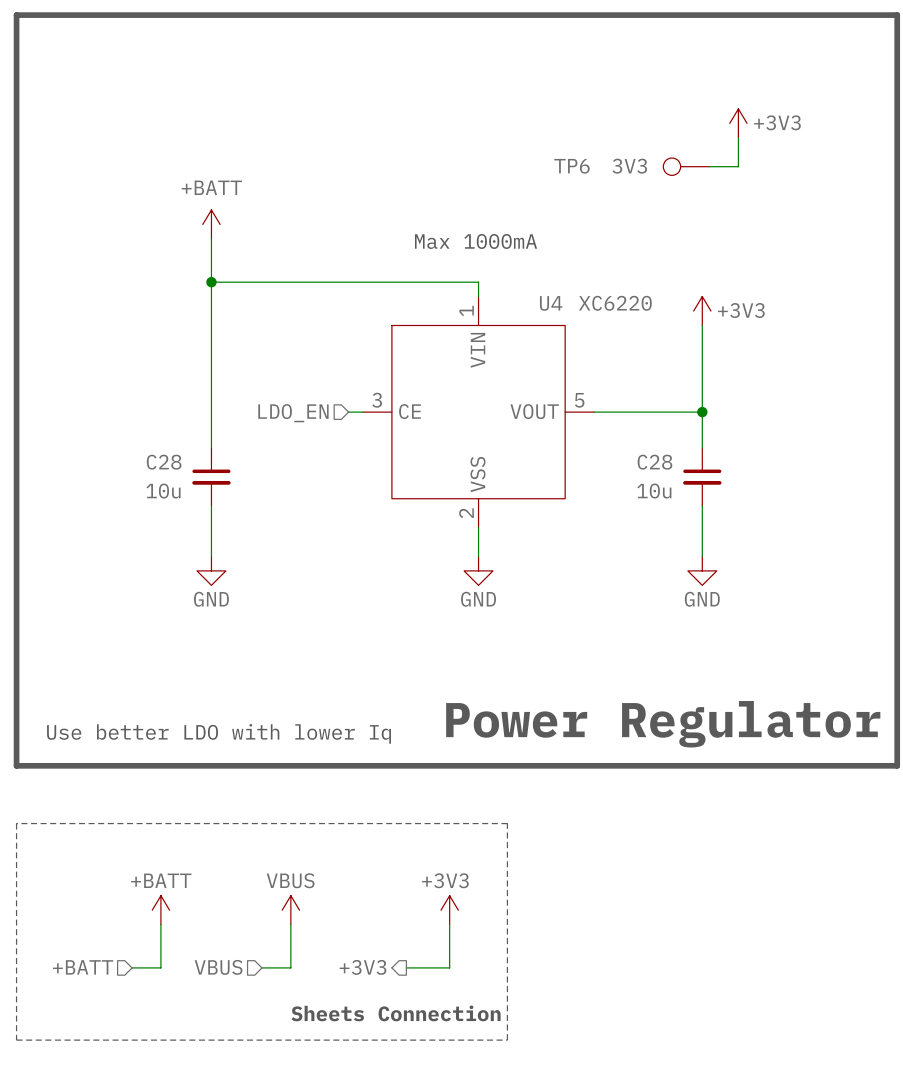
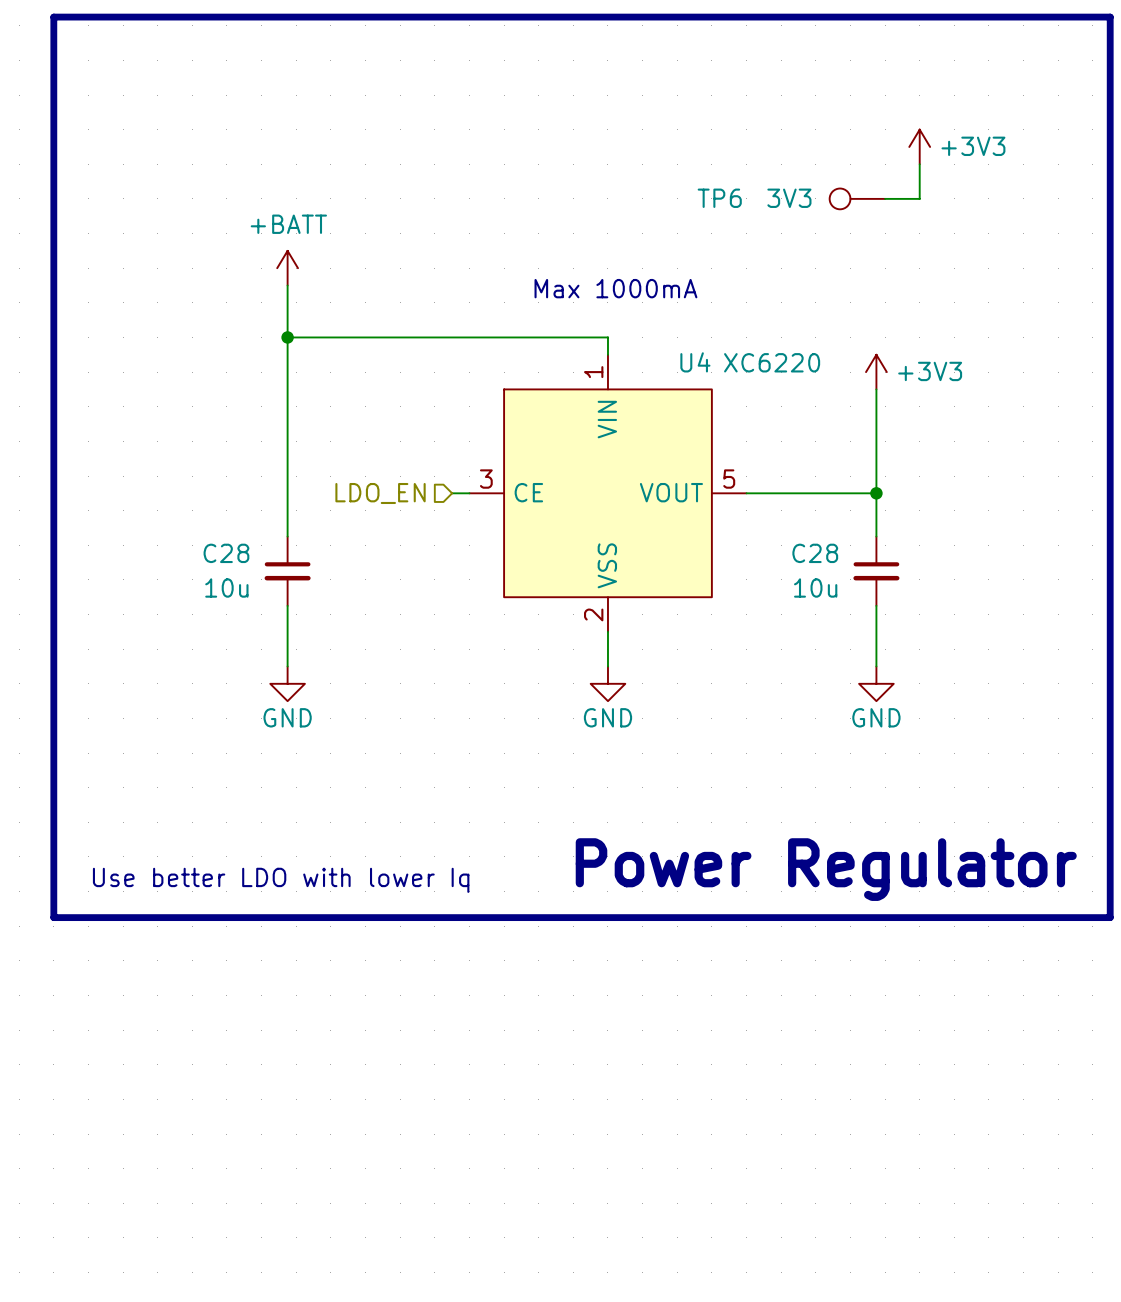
line: (16, 823) (507, 823) (507, 1040) (16, 1040) (16, 823) -> none
power symbol: +BATT (160, 910) -> none
power symbol: VBUS (290, 910) -> none
power symbol: +3V3 (449, 910) -> none
wire: (160, 924) (160, 967) (132, 967) -> none
wire: (290, 924) (290, 967) (261, 967) -> none
wire: (449, 924) (449, 967) (406, 967) -> none
hierarchical label: +BATT (83, 967) -> none
hierarchical label: VBUS (218, 967) -> none
hierarchical label: +3V3 (362, 967) -> none
text: Sheets Connection (396, 1013) -> none

